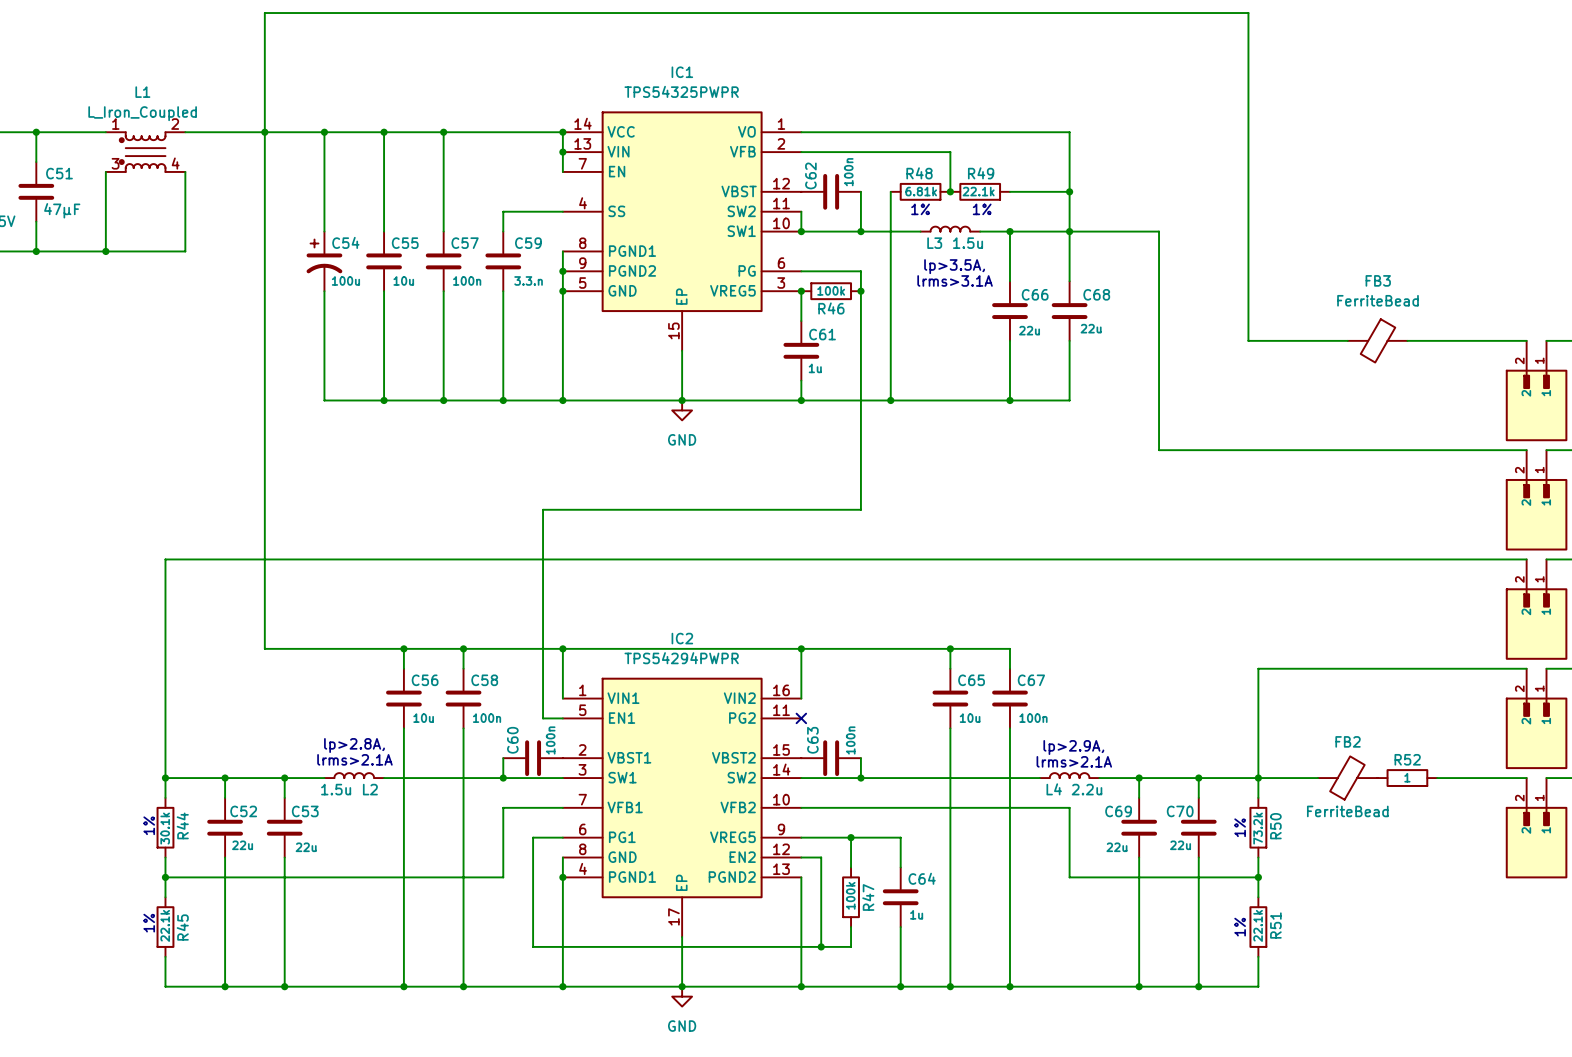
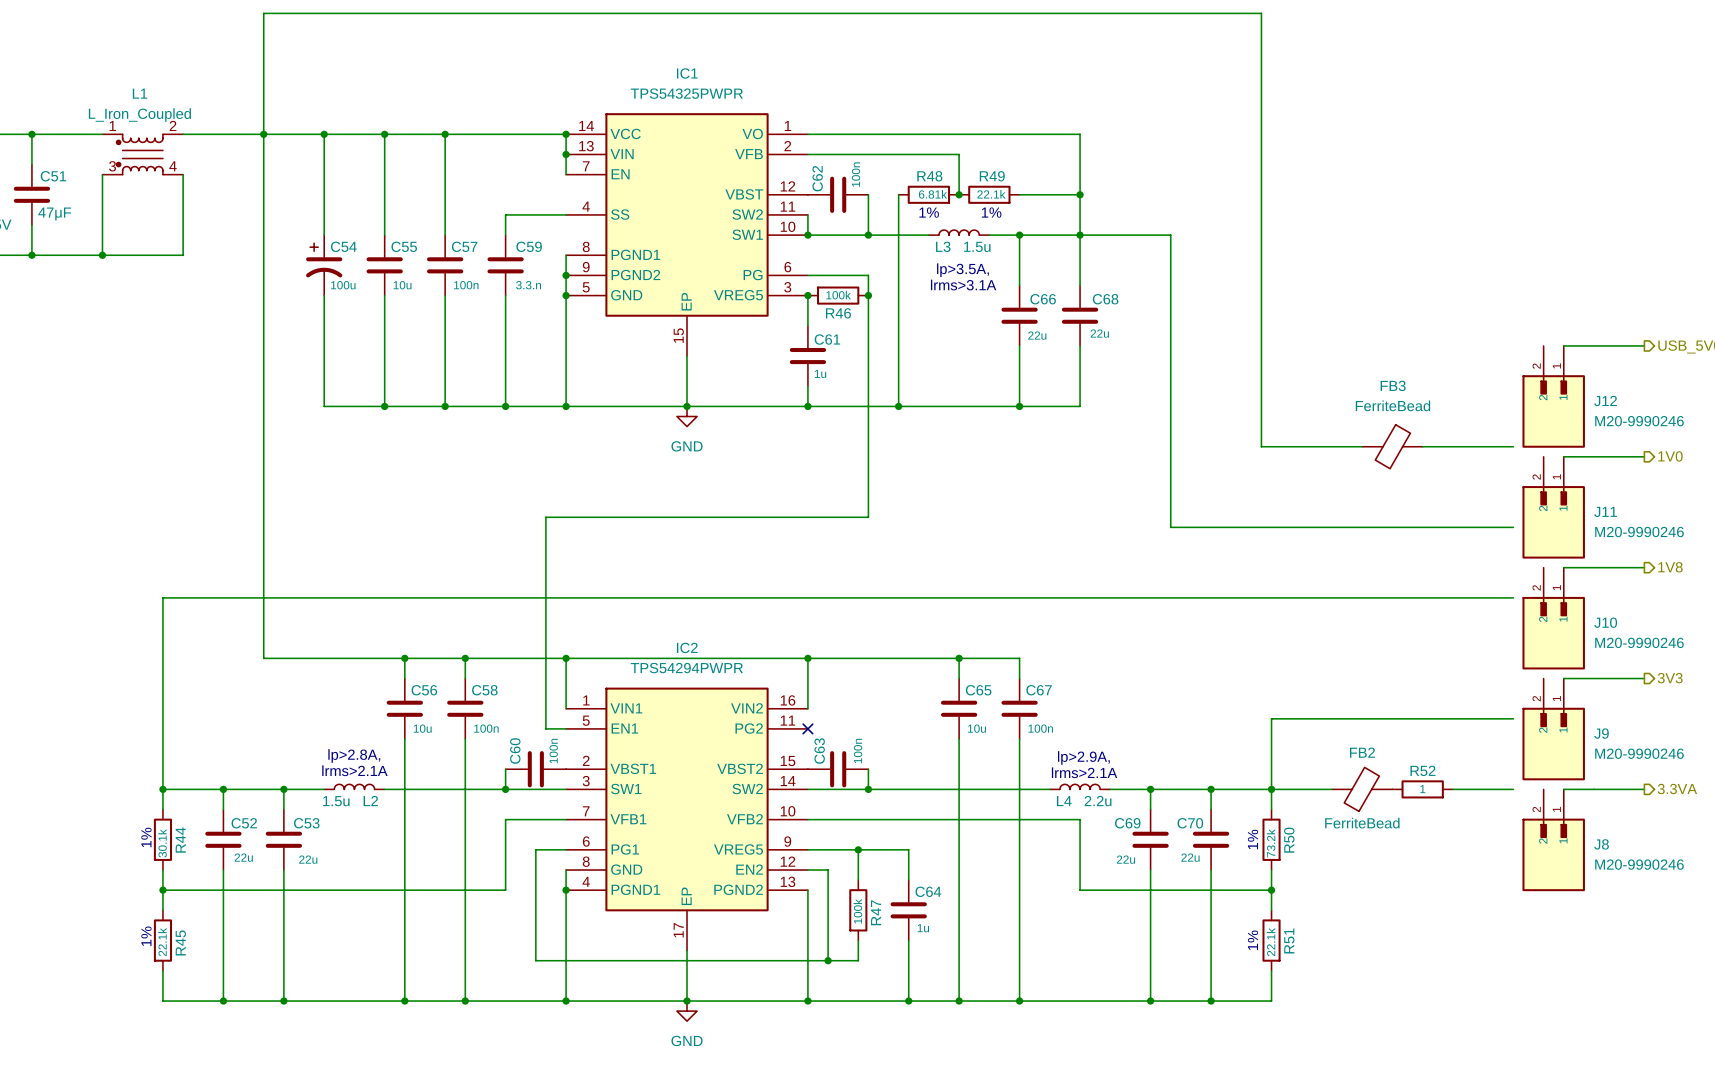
wire: (1248, 340) (1347, 340) -> (1261, 345) (1261, 446) (1362, 446)
FB3 position: (1377, 340) -> (1392, 446)
wire: (1407, 340) (1526, 340) -> none
wire: none -> (1422, 446) (1513, 446)
wire: (1159, 450) (1526, 450) -> (1170, 456) (1170, 527) (1513, 527)
wire: (1526, 559) (165, 559) (165, 589) -> (1513, 597) (162, 597)
wire: (1526, 668) (1258, 668) (1258, 708) -> (1513, 718) (1271, 718)
wire: (1496, 778) (1526, 778) -> none

